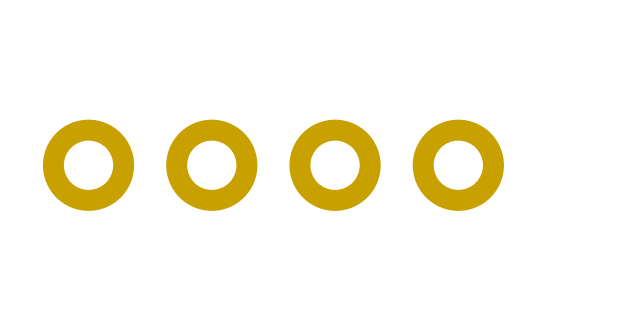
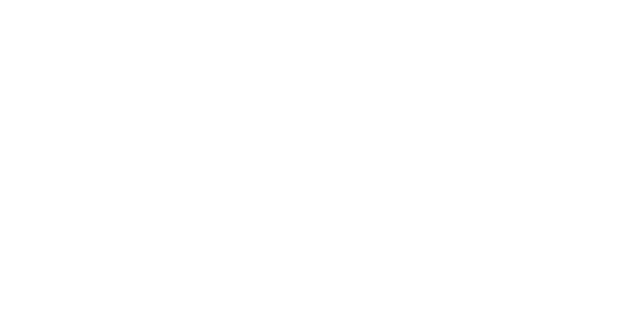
part: (150, 165) -> none
part: (396, 165) -> none

